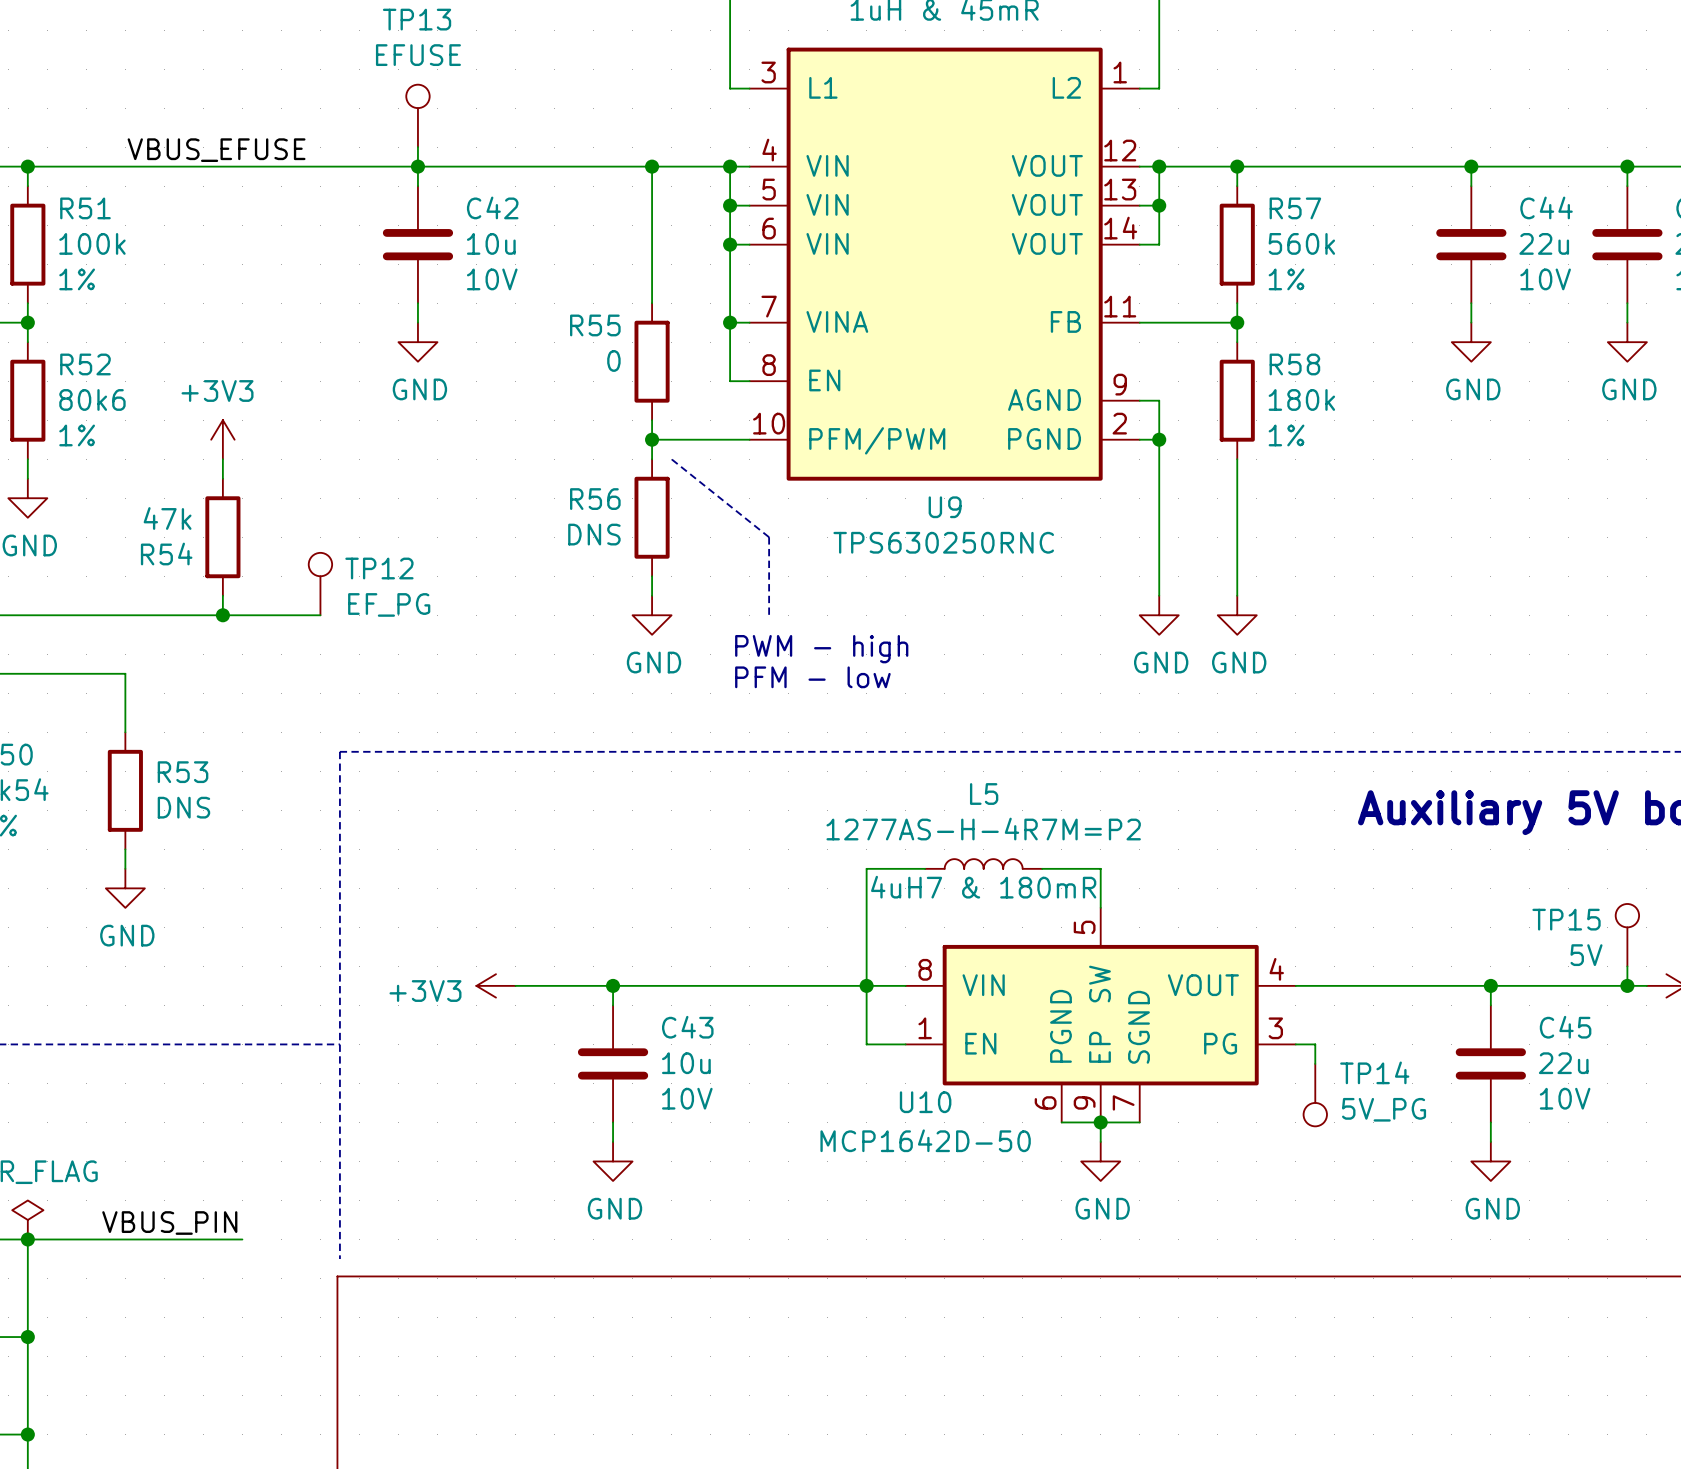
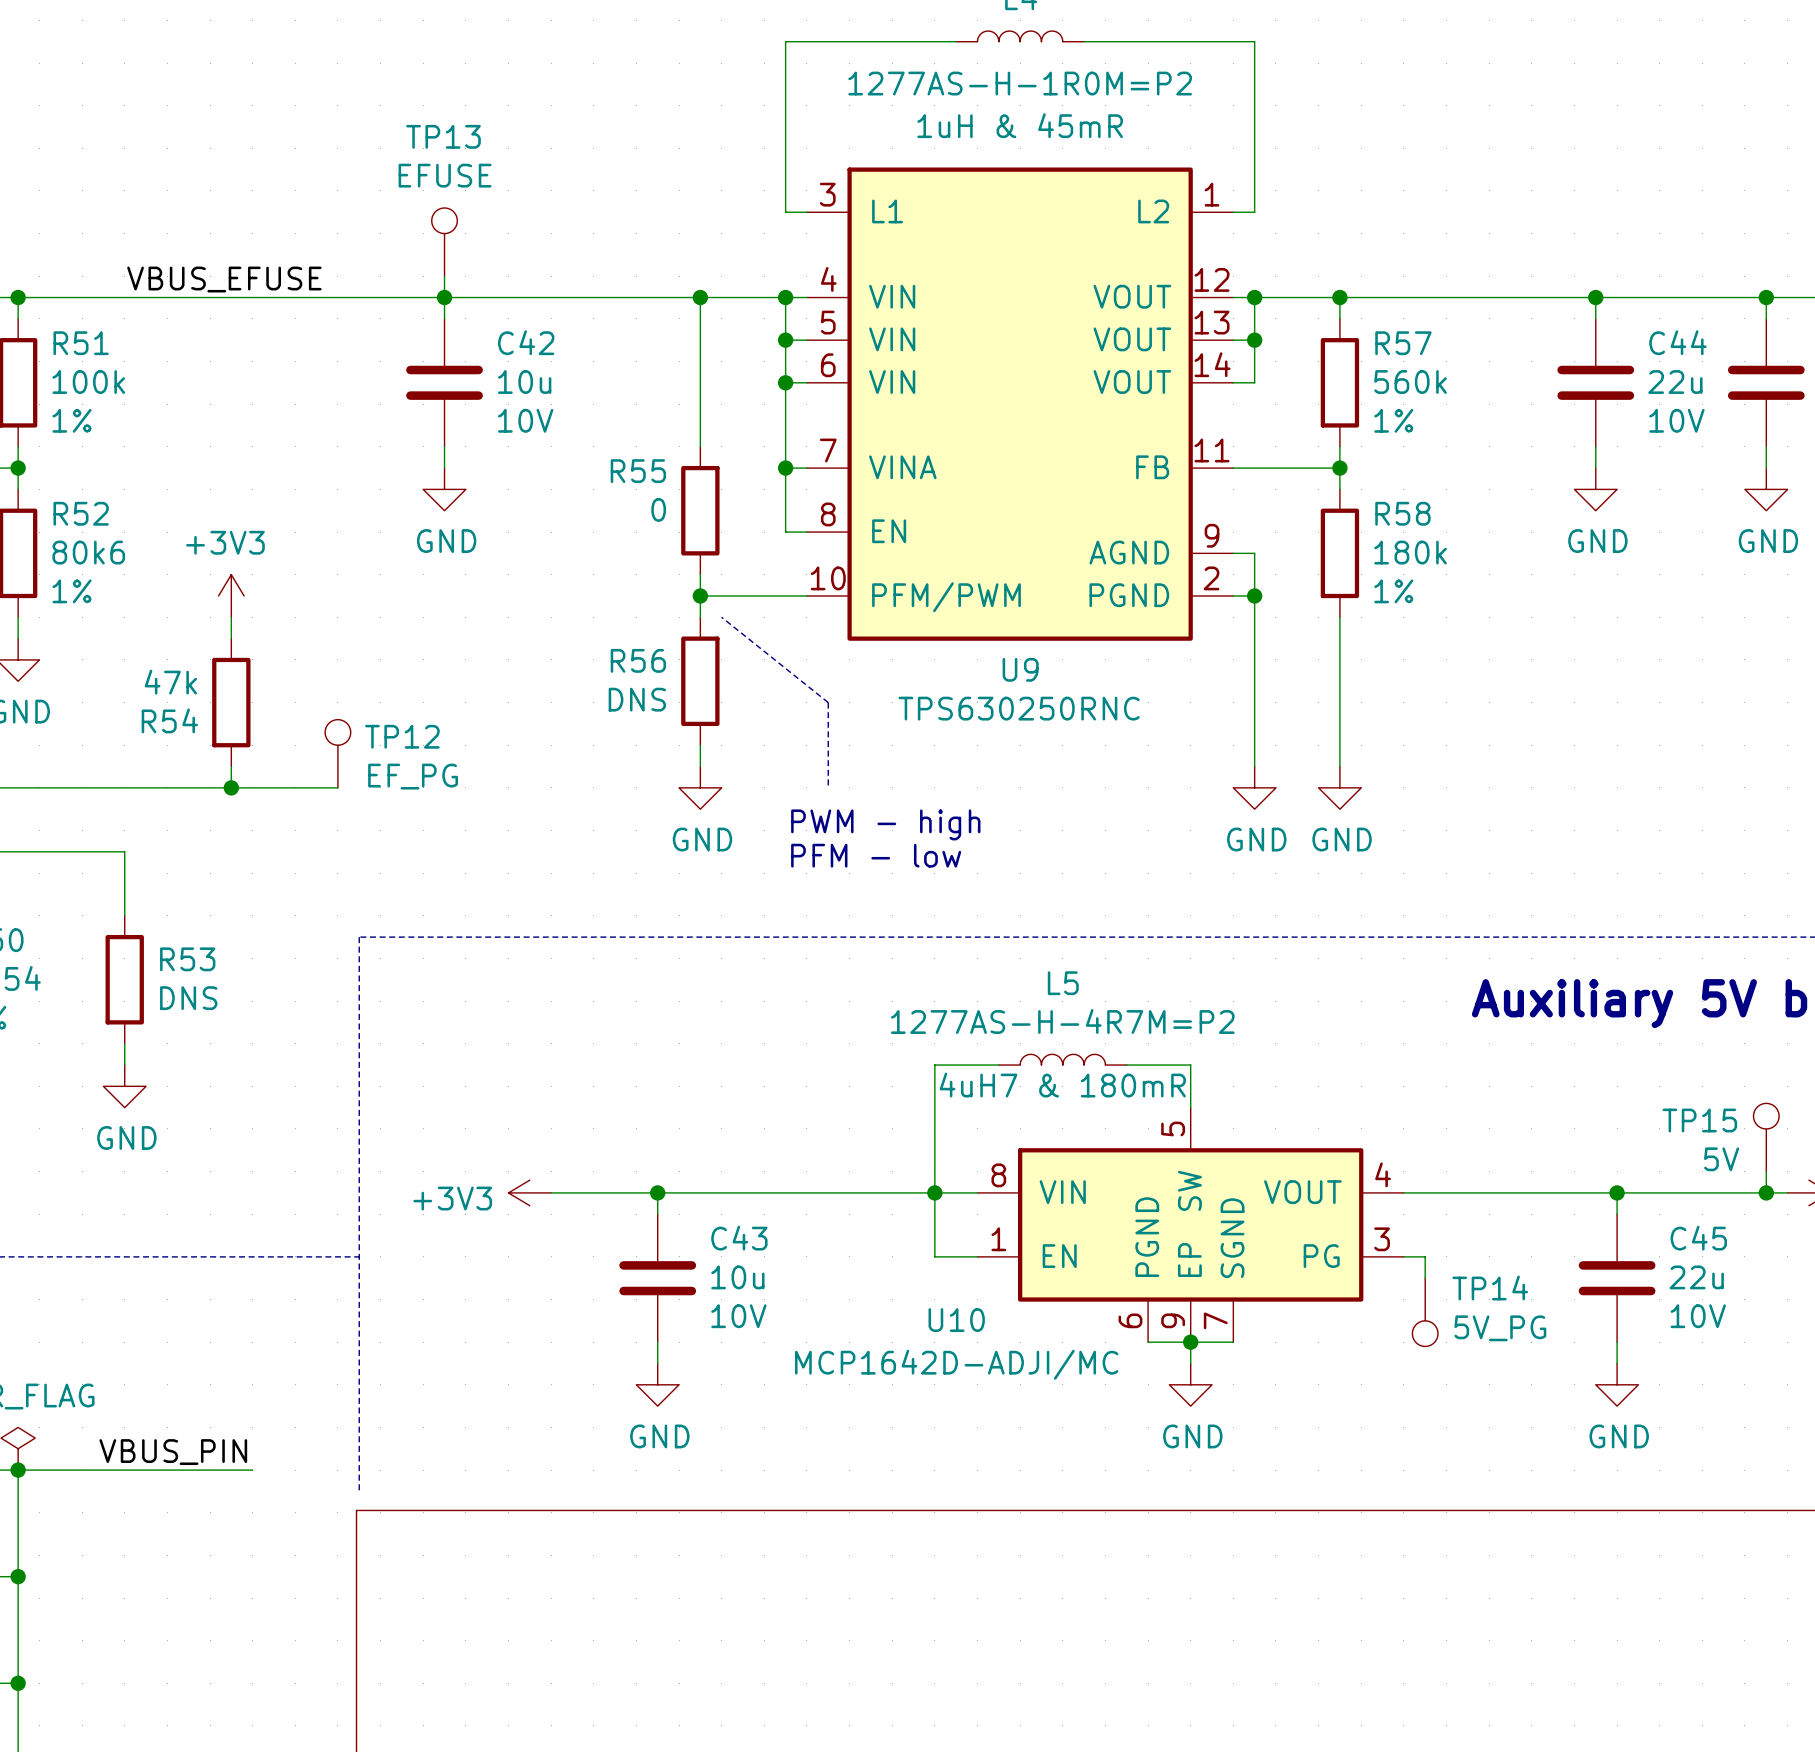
U10 name position: U10 (925, 1102) -> U10 (956, 1320)
U10 value: MCP1642D-50 (925, 1140) -> MCP1642D-ADJI/MC (956, 1364)

